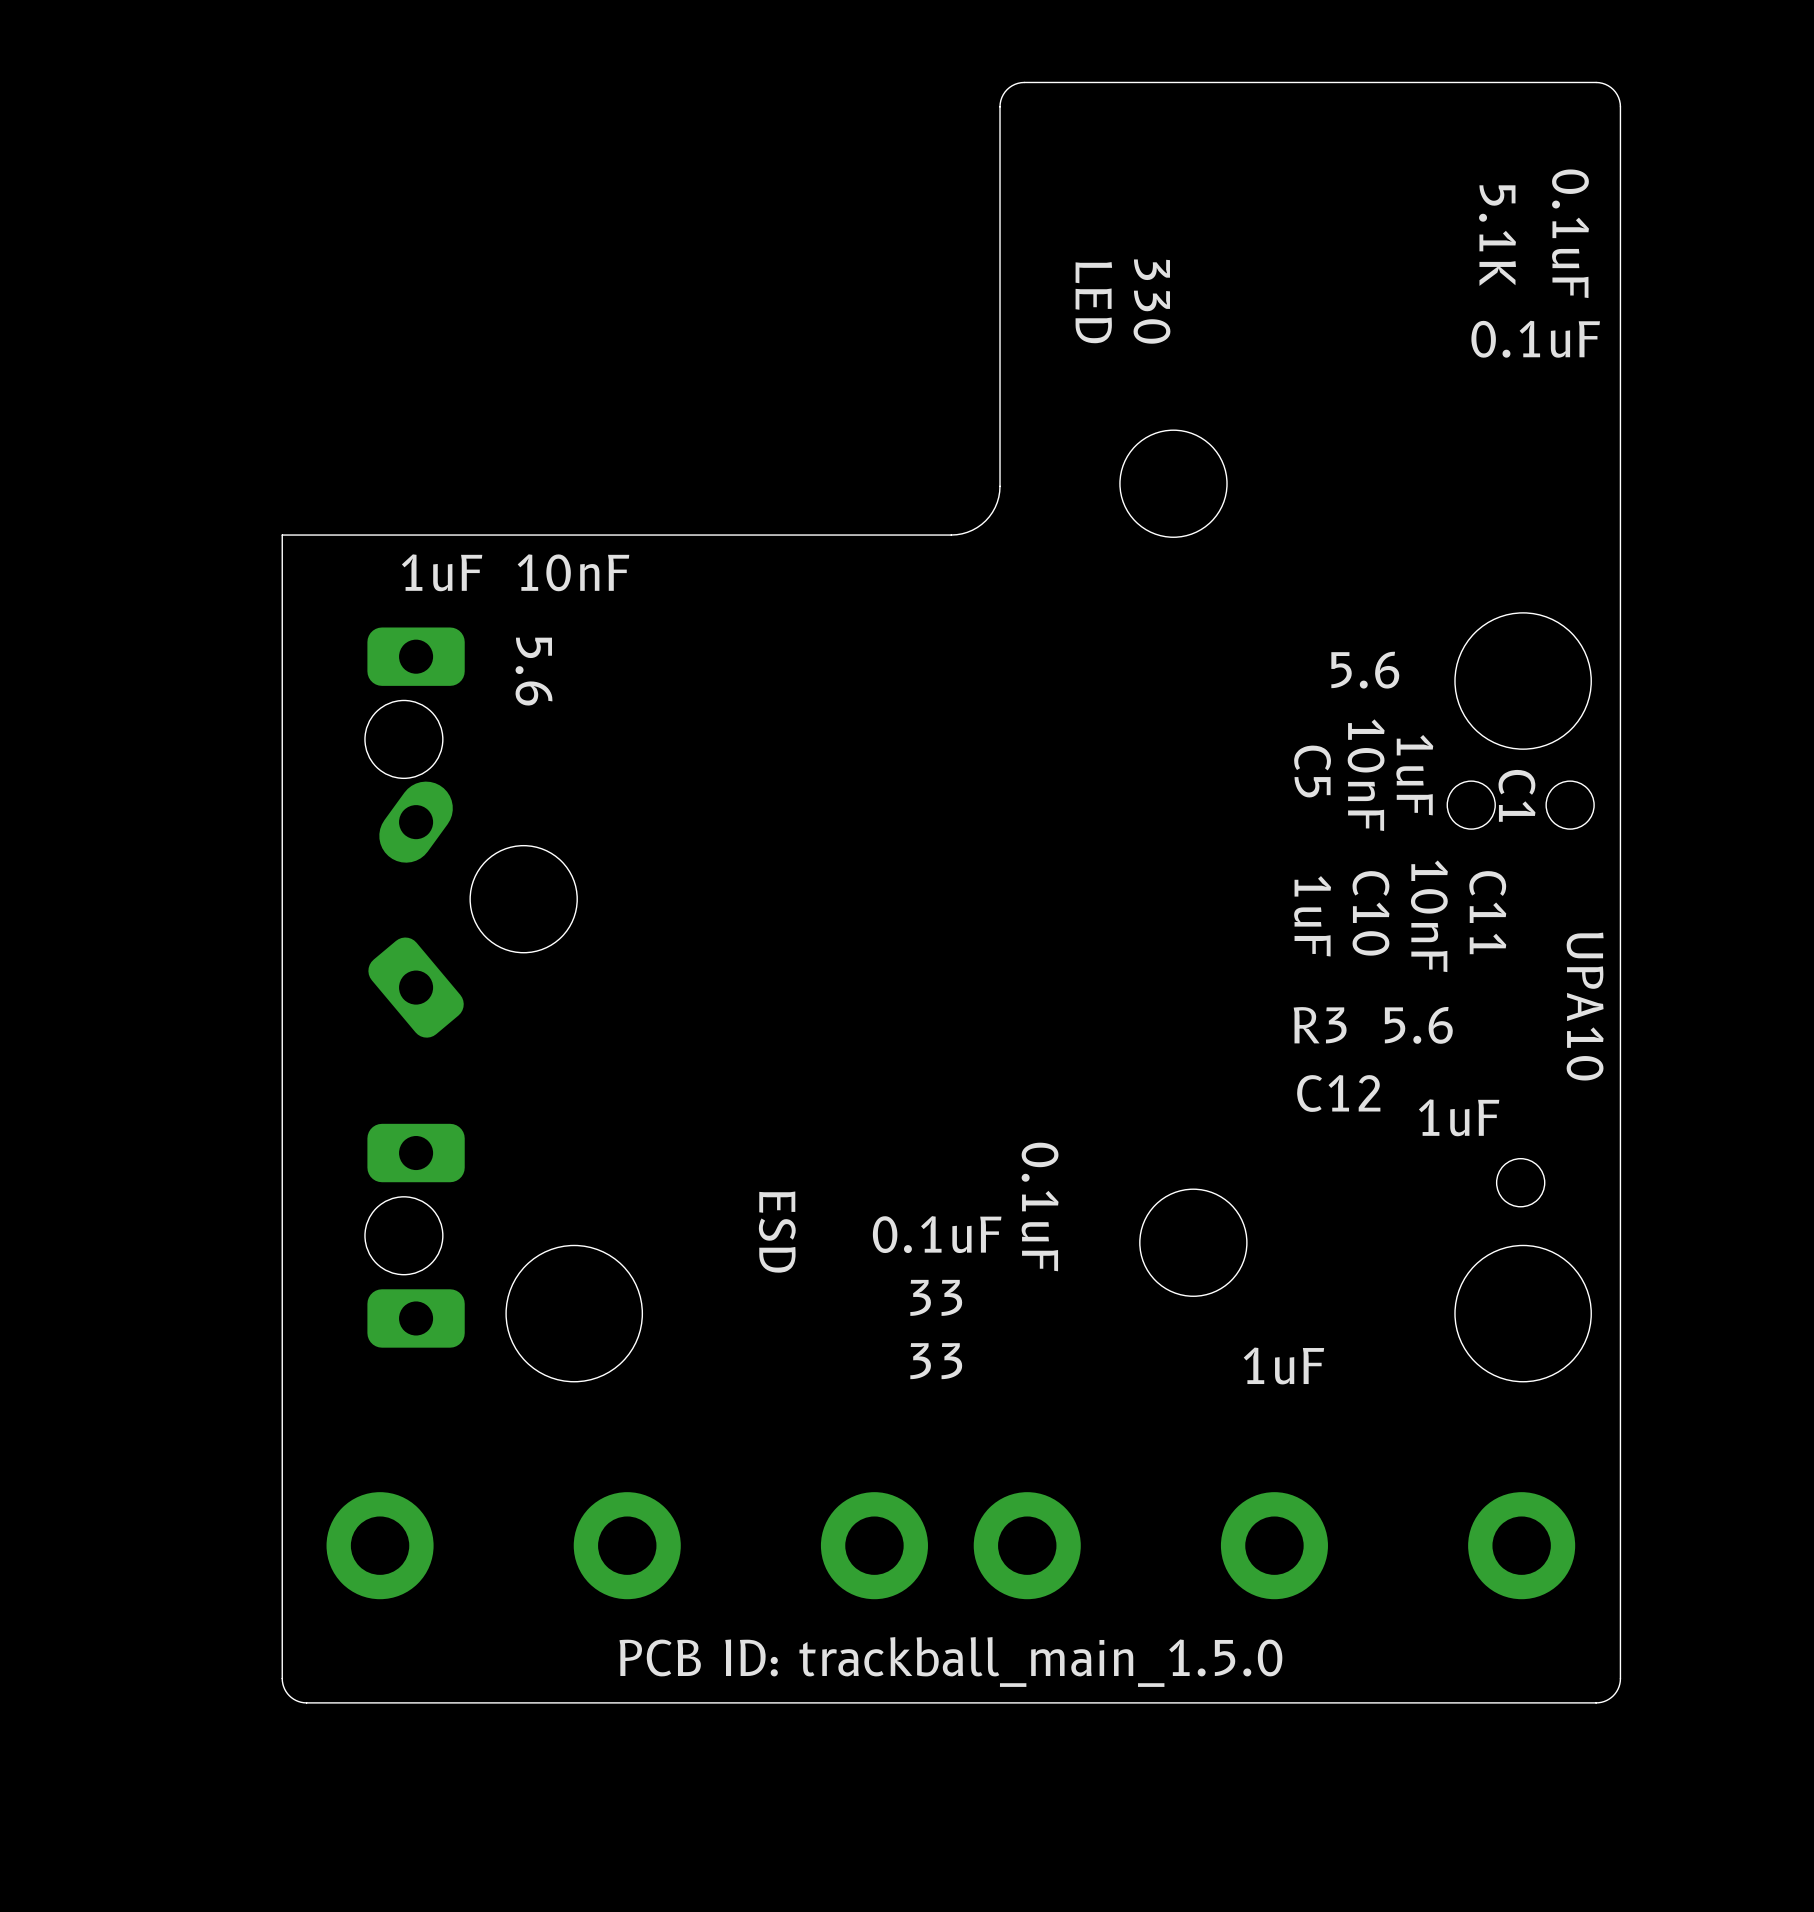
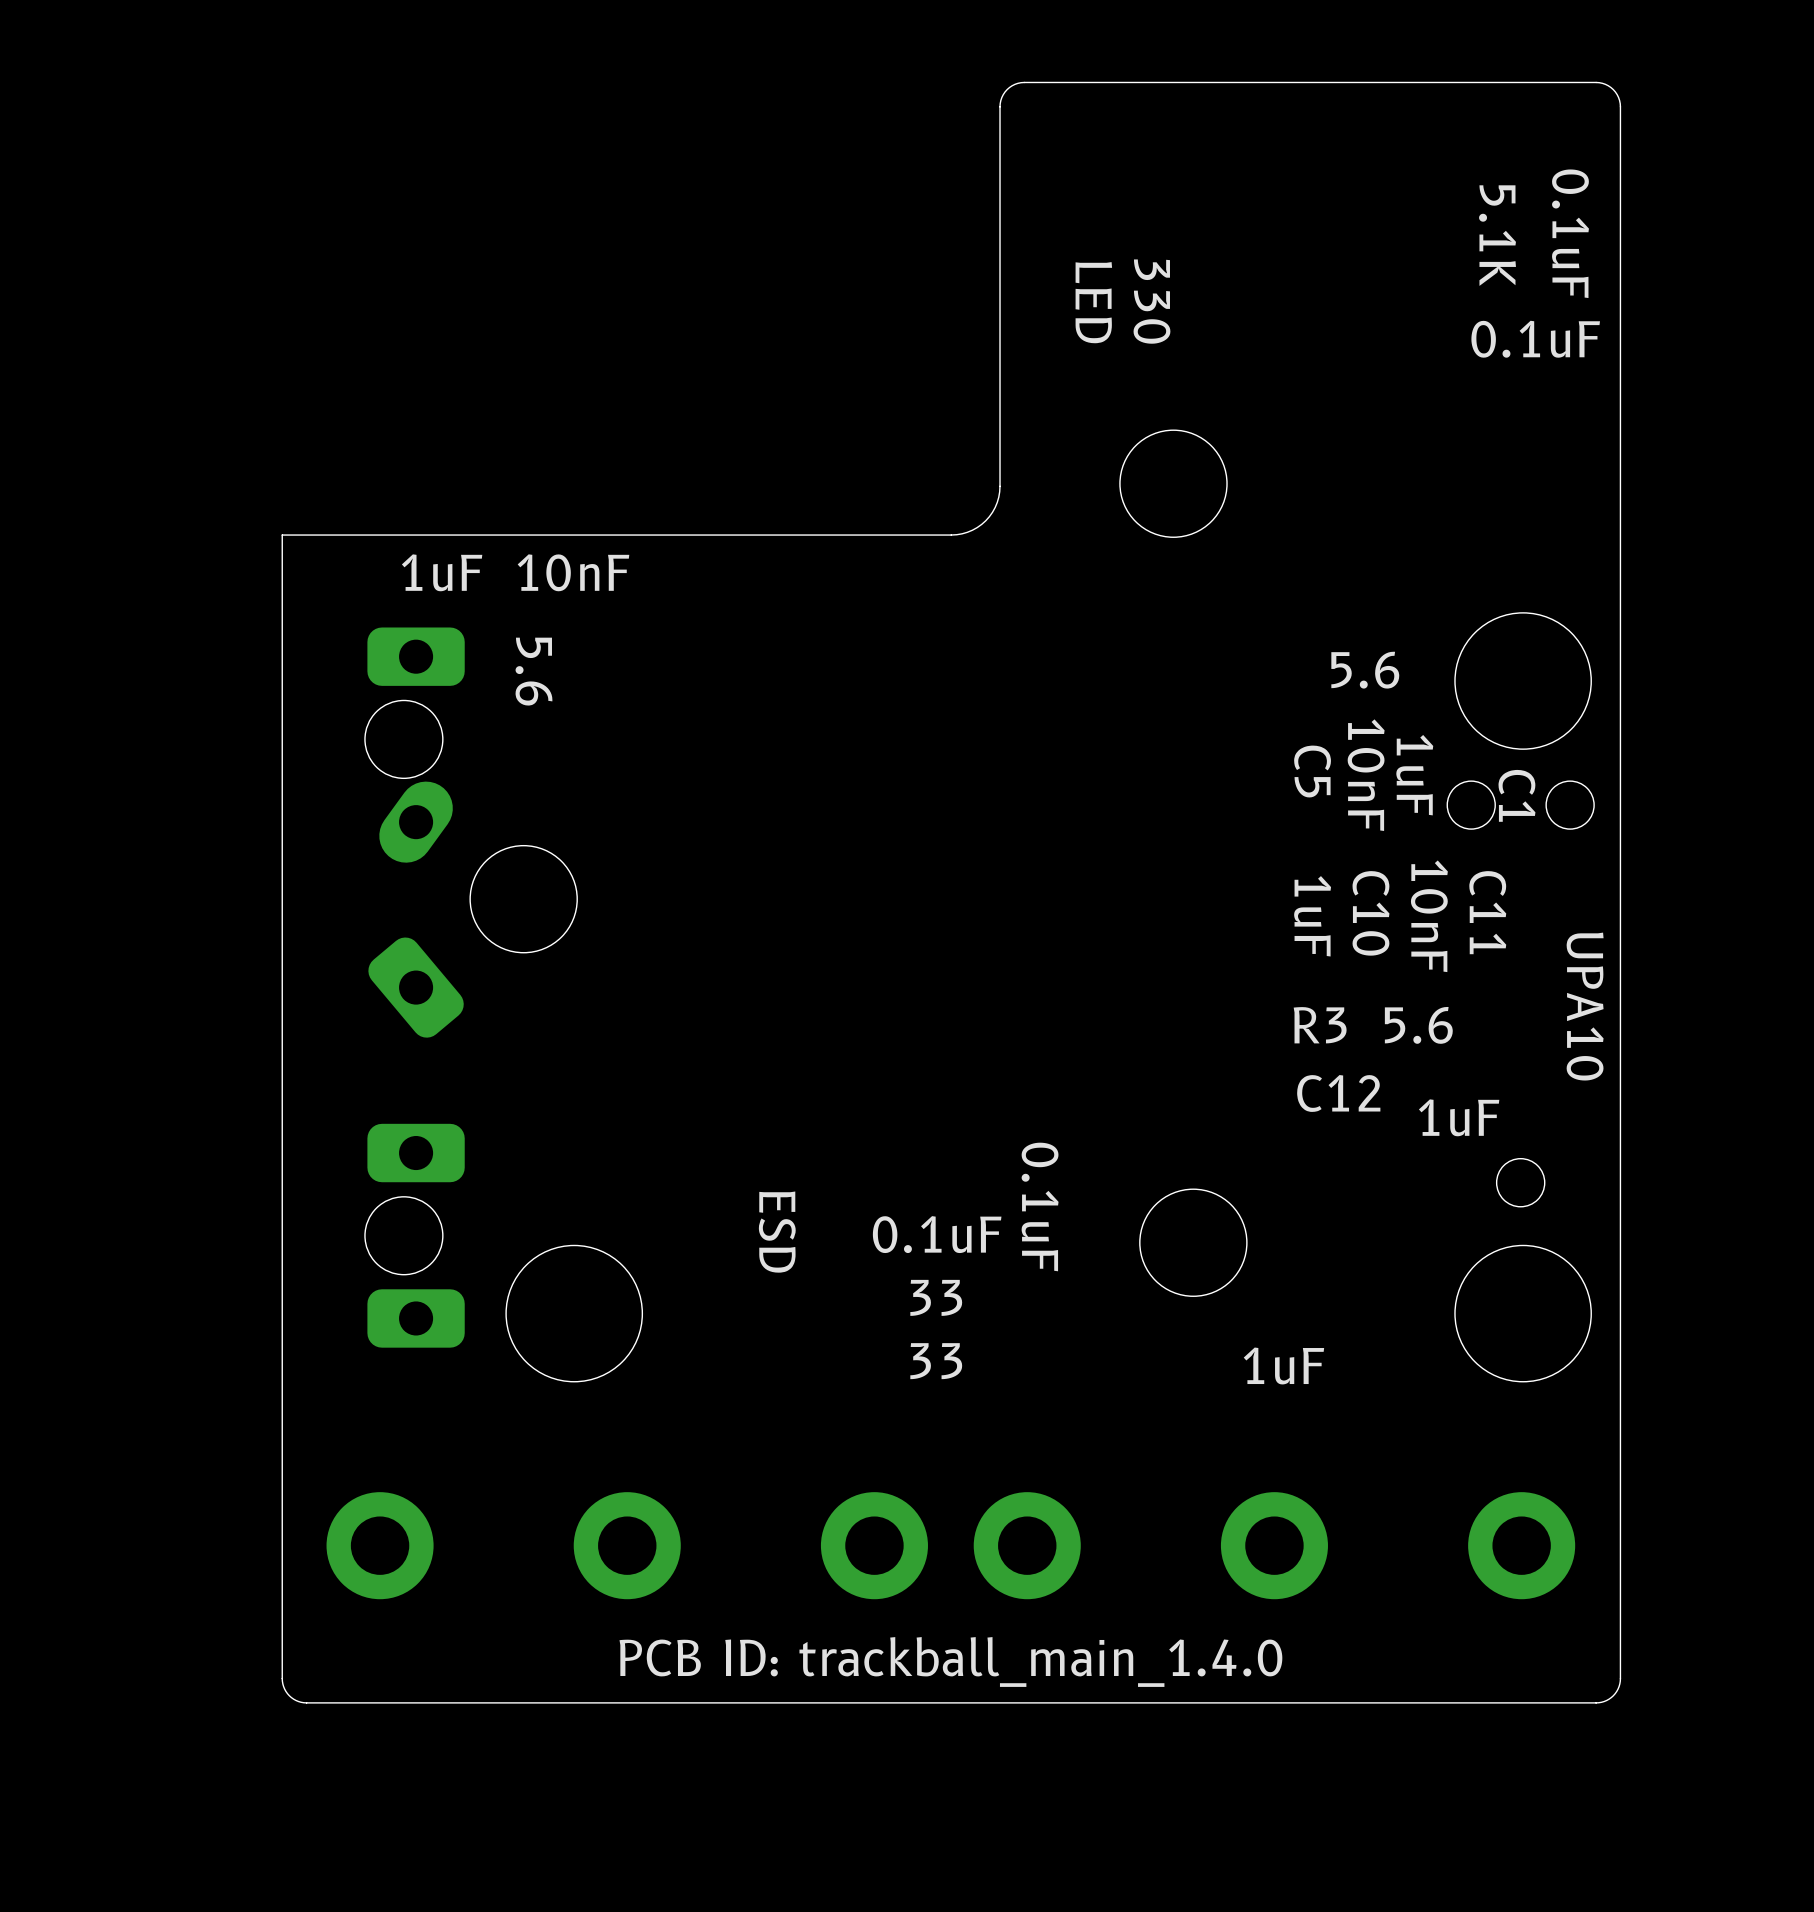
text: PCB ID: trackball_main_1.5.0 (950, 1662) -> PCB ID: trackball_main_1.4.0 (950, 1662)

